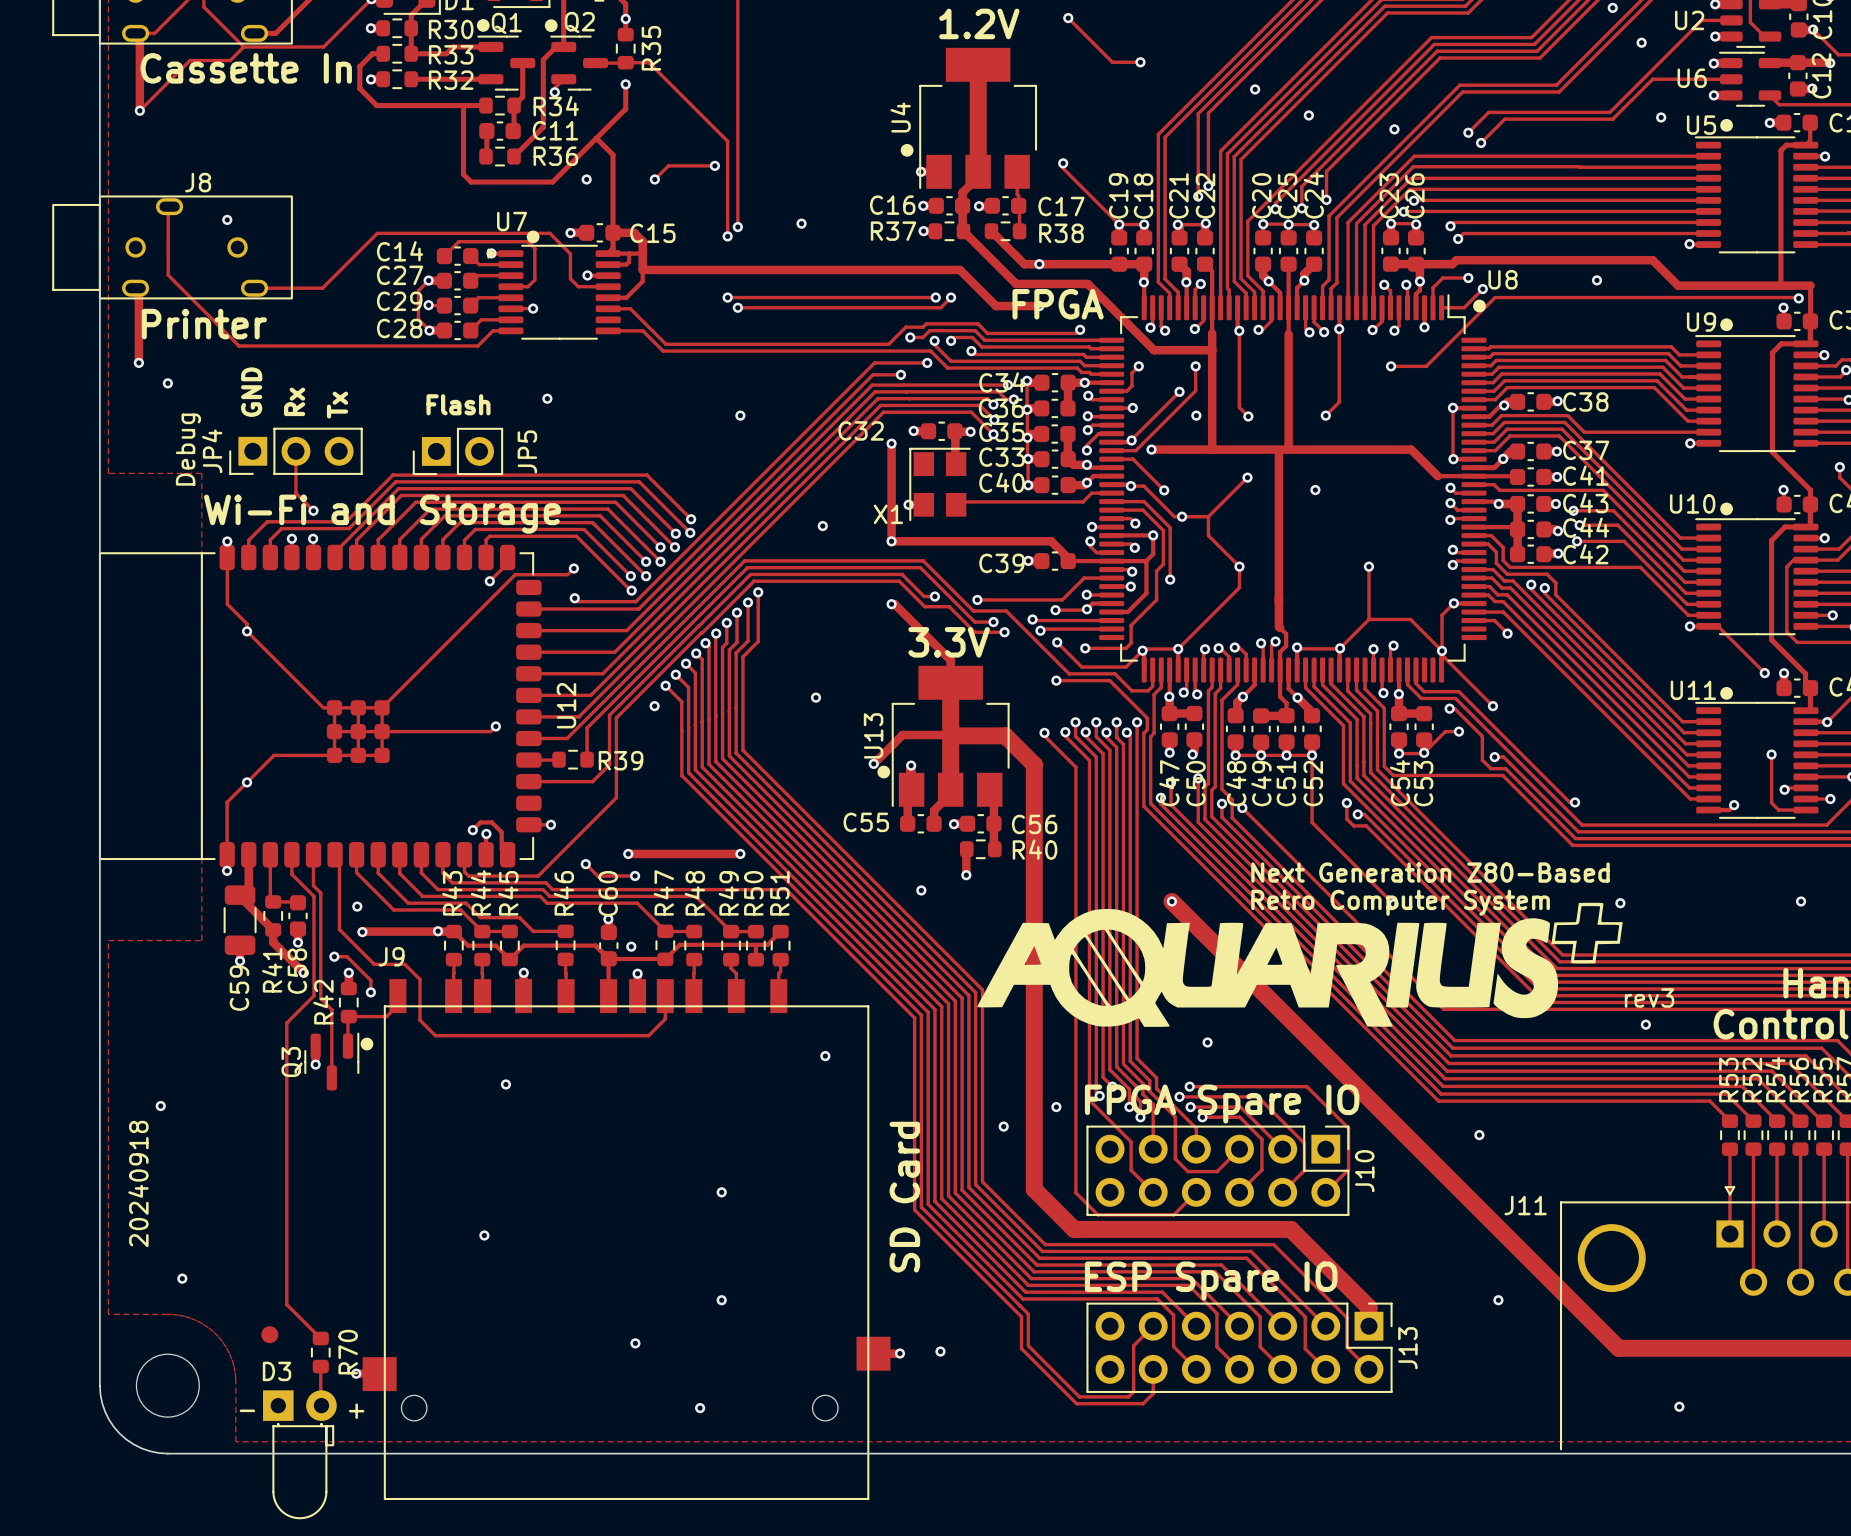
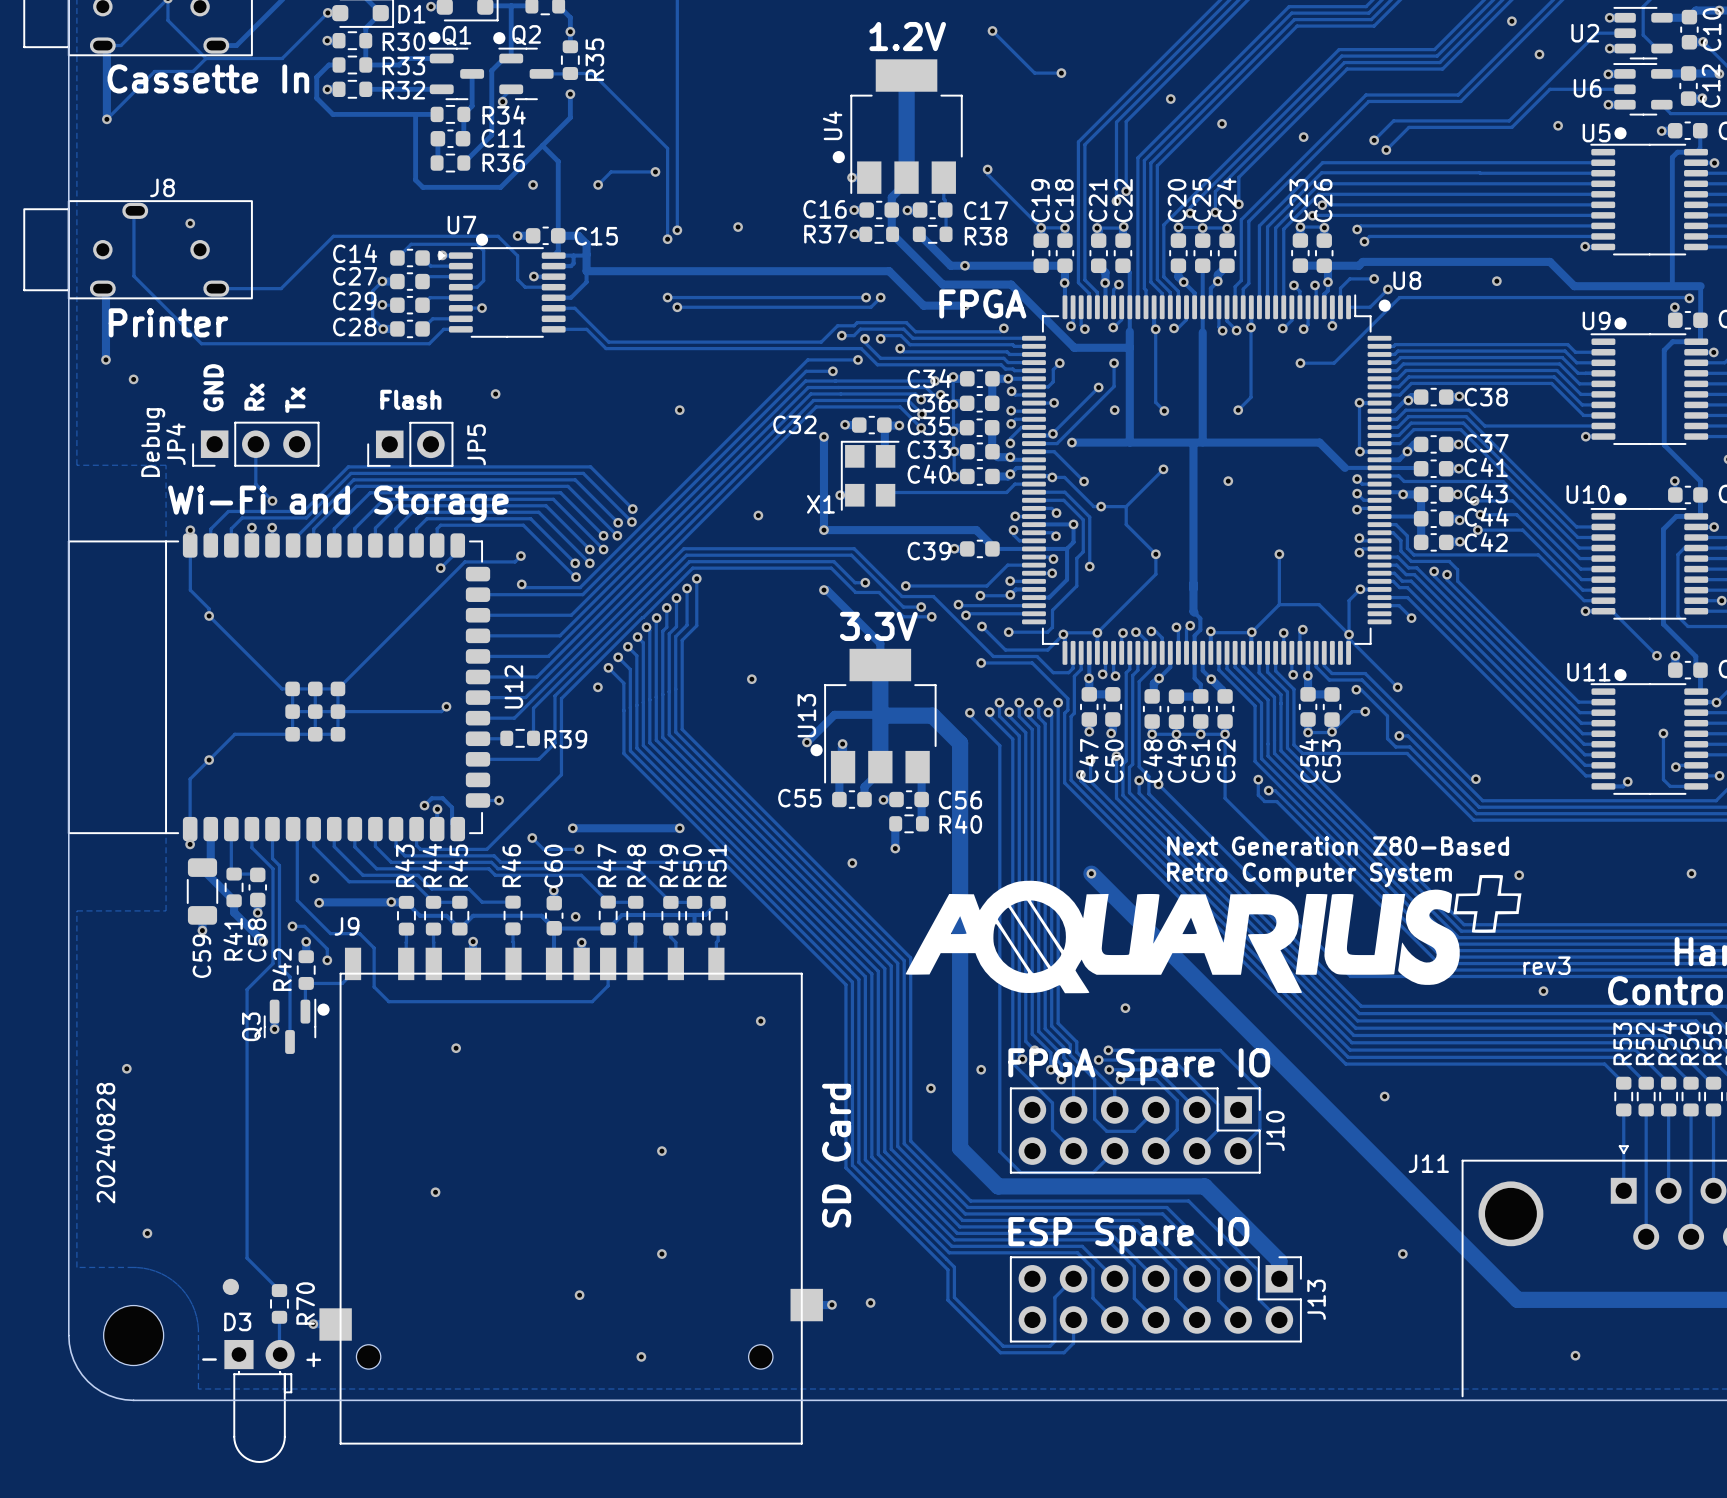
text: 20240918 (138, 1184) -> 20240828 (105, 1143)

